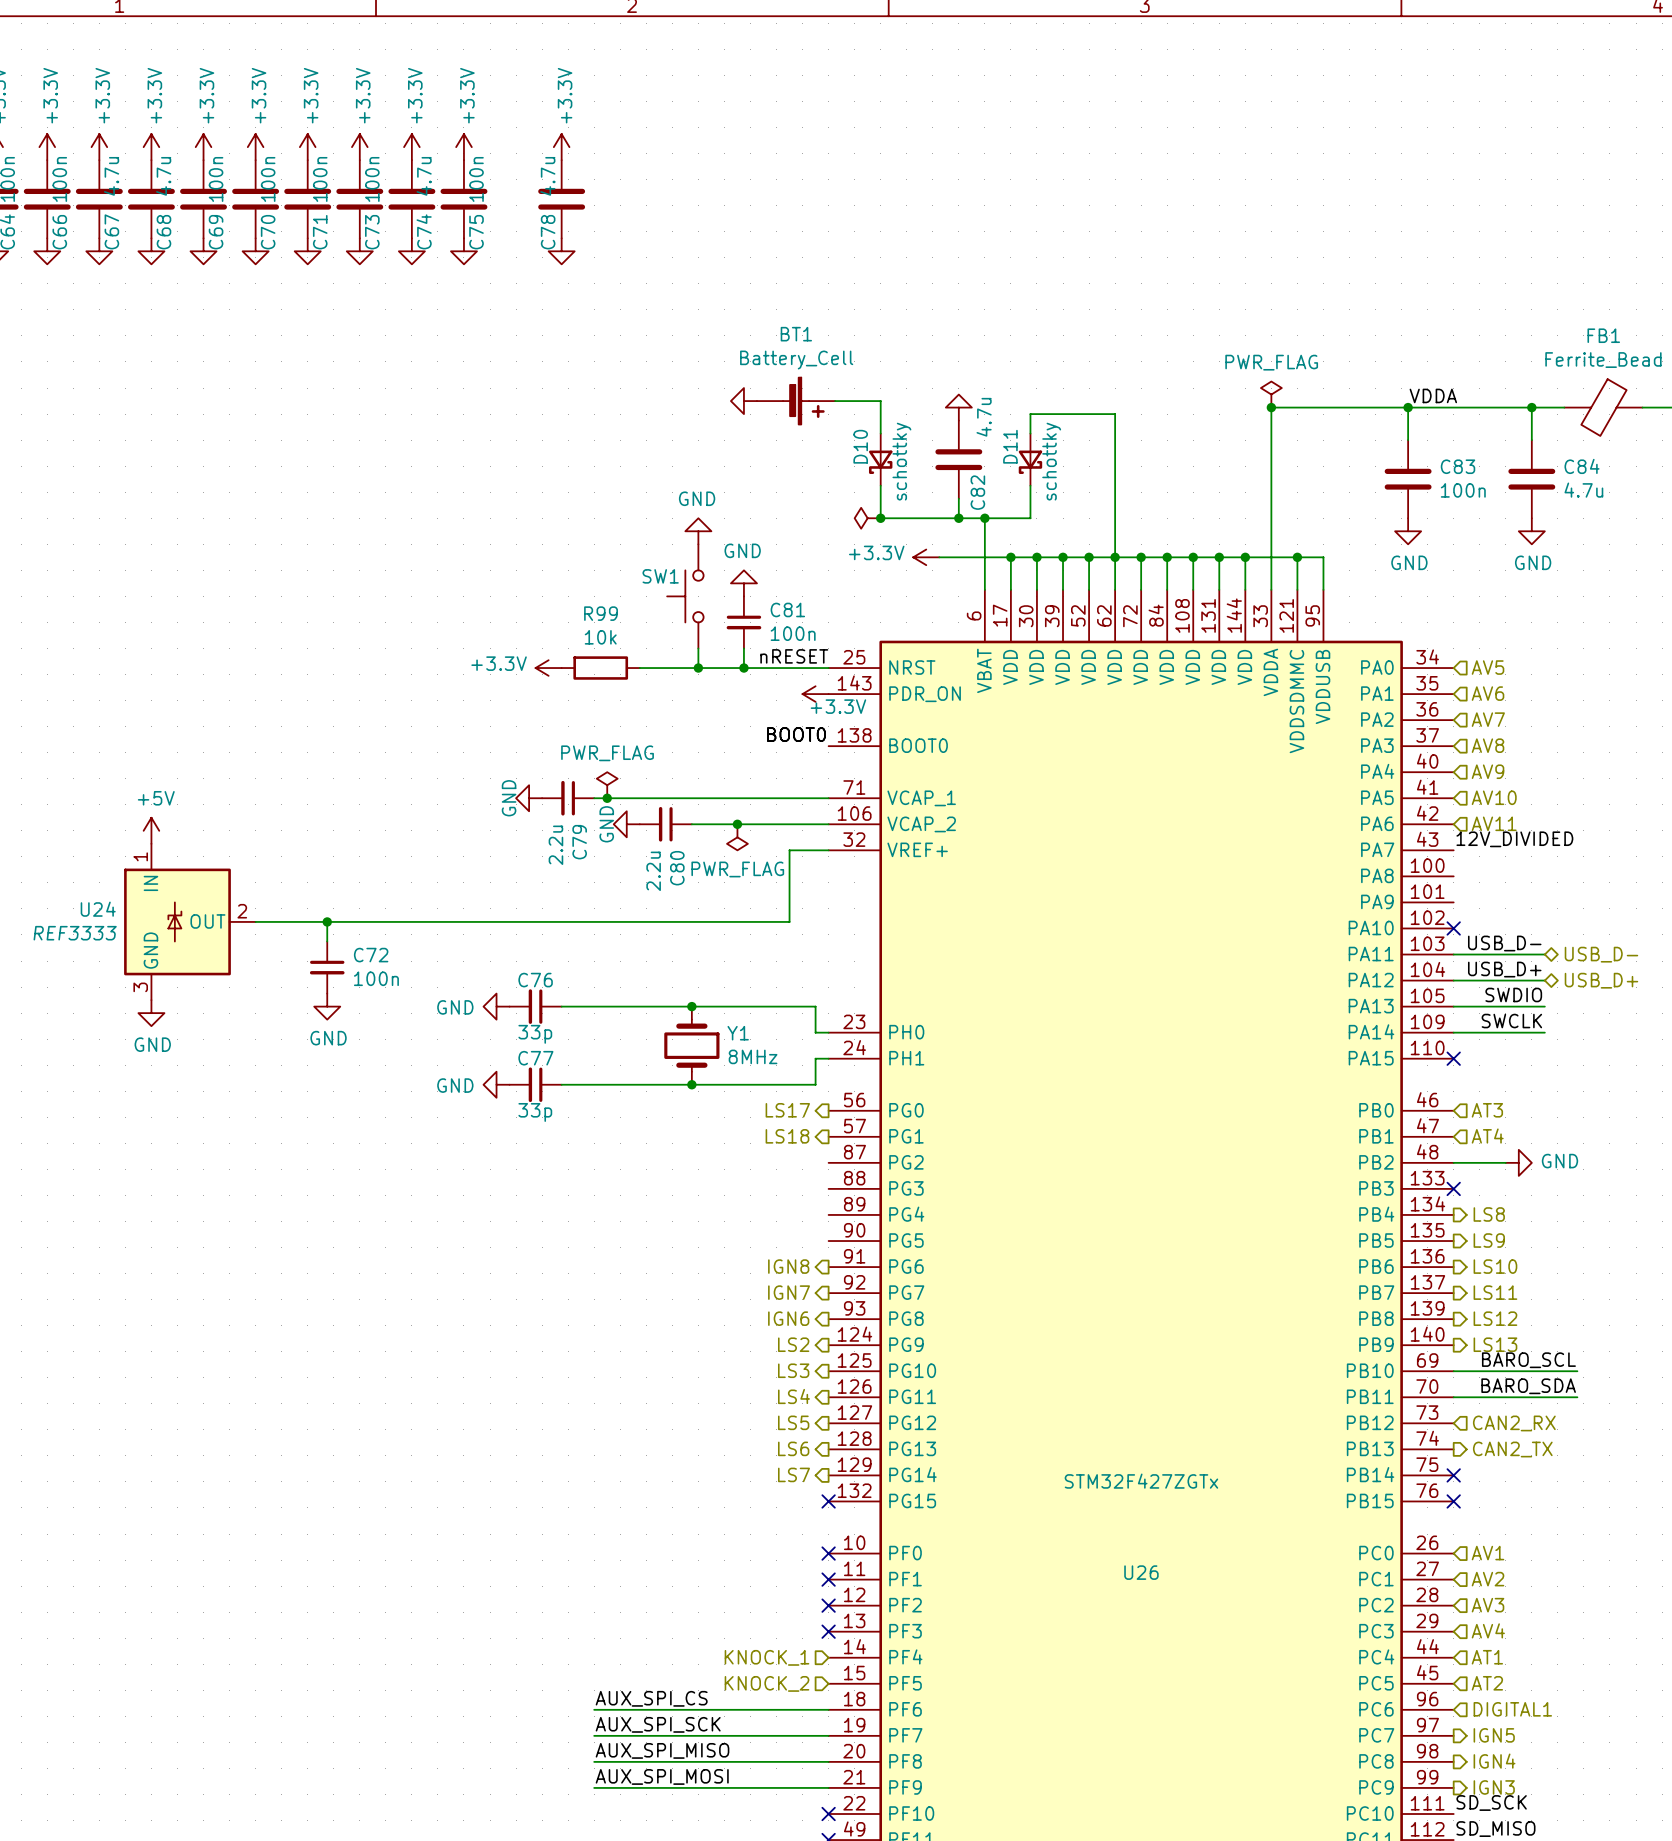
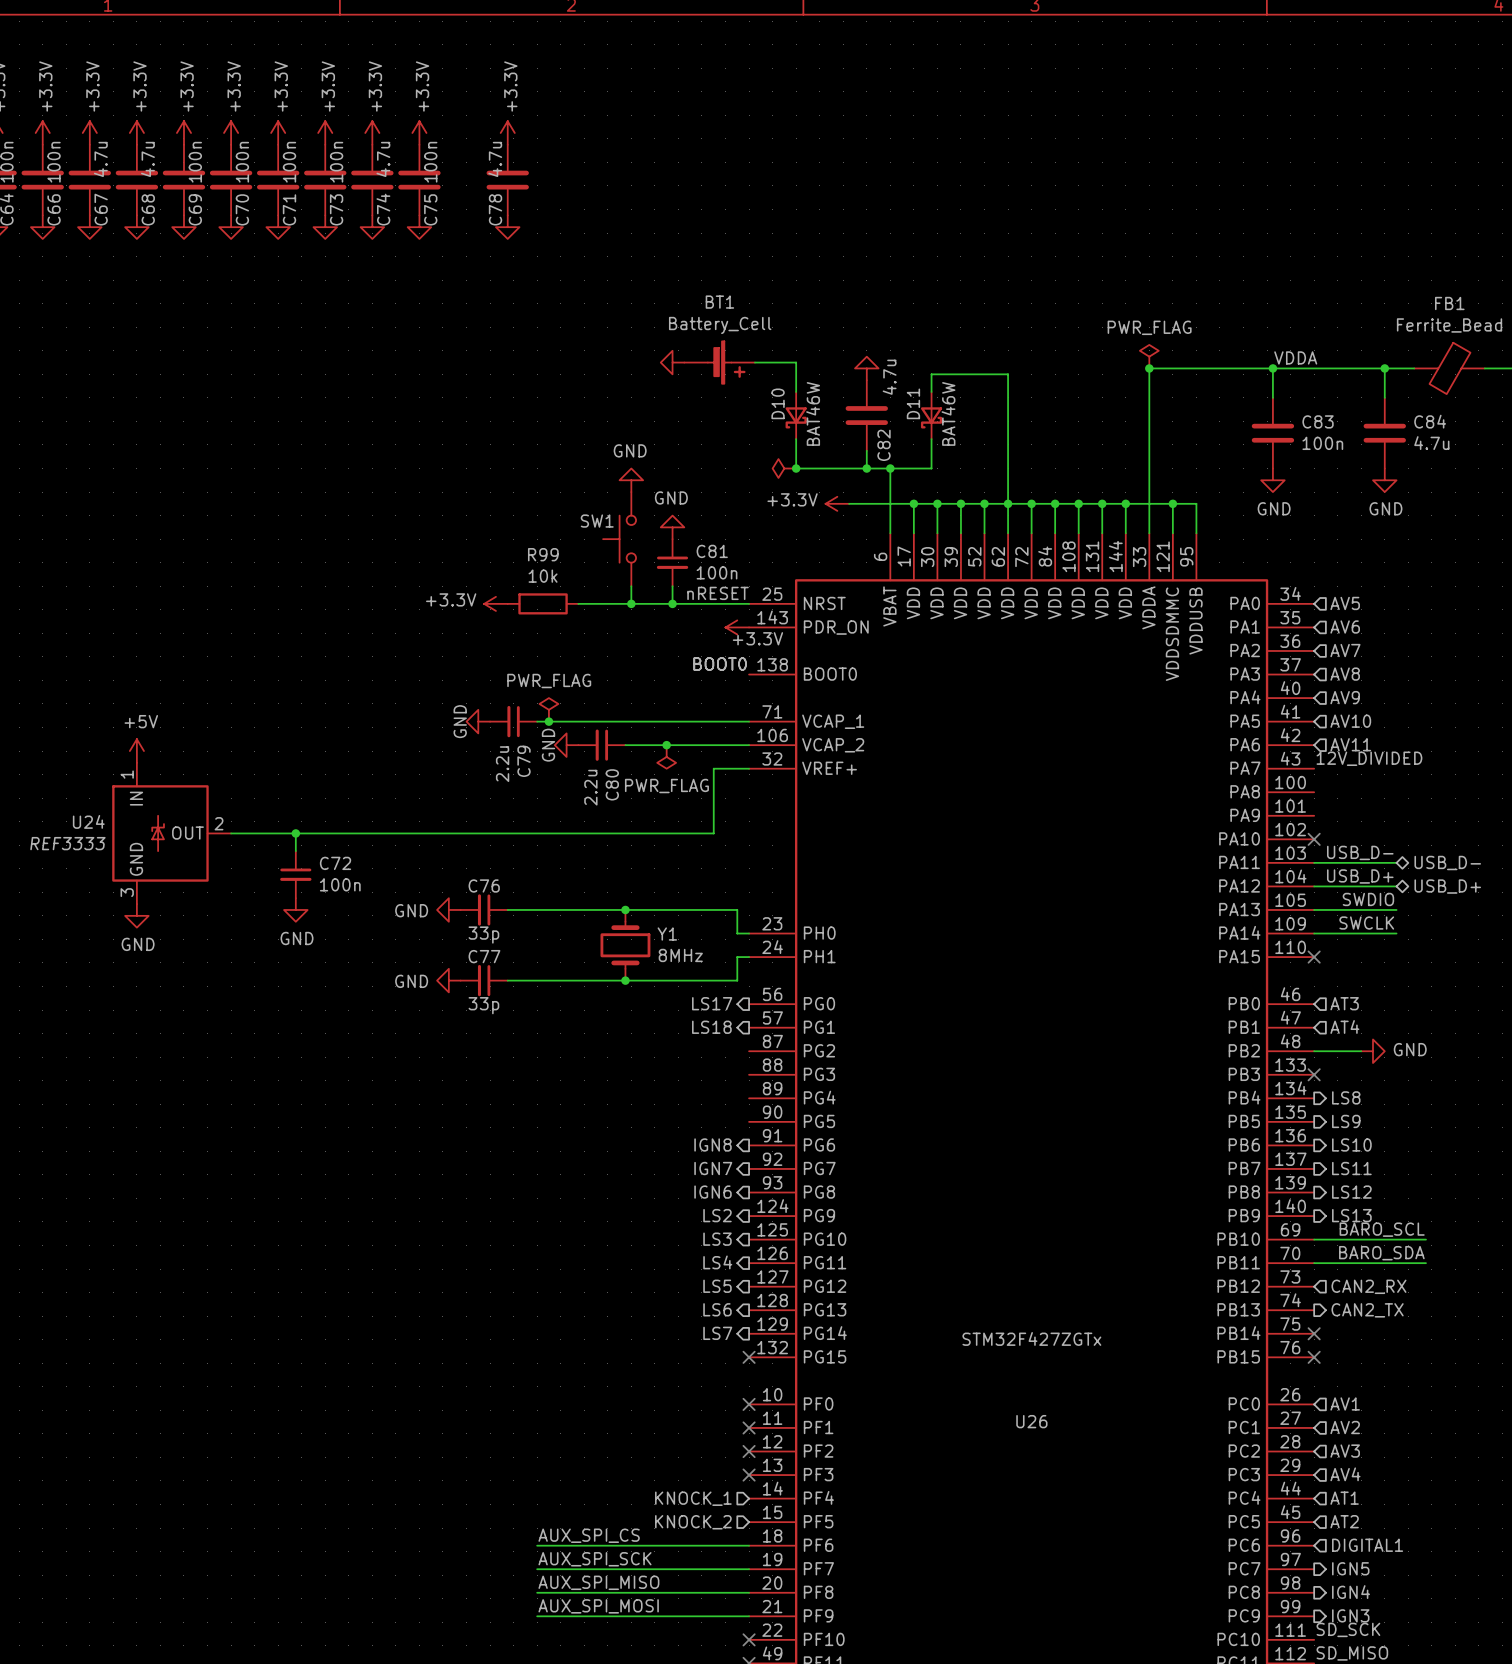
D10 value: schottky (901, 461) -> BAT46W (813, 413)
D11 value: schottky (1051, 461) -> BAT46W (948, 413)

